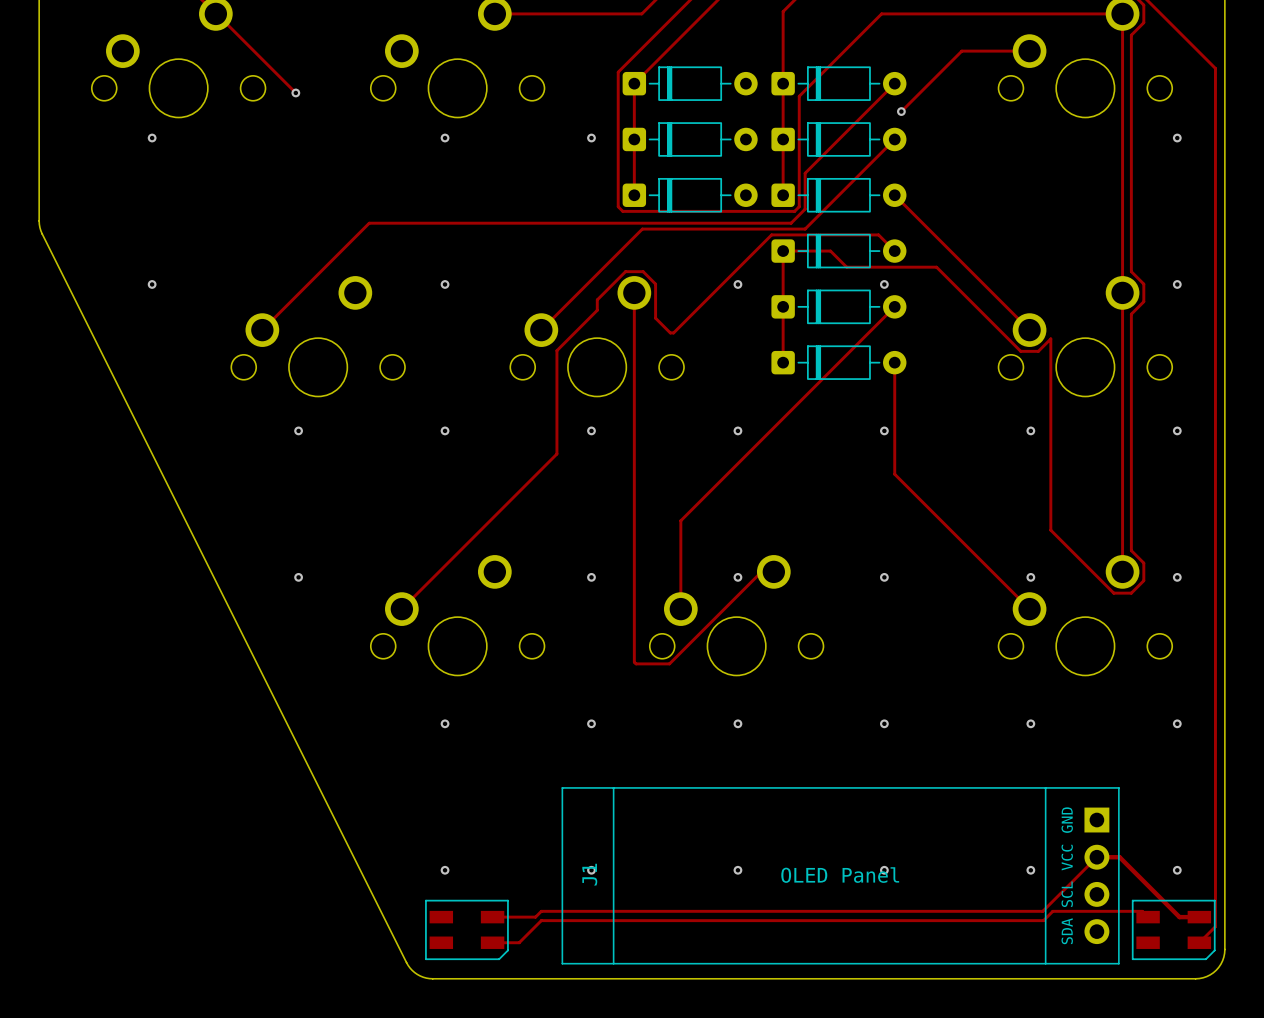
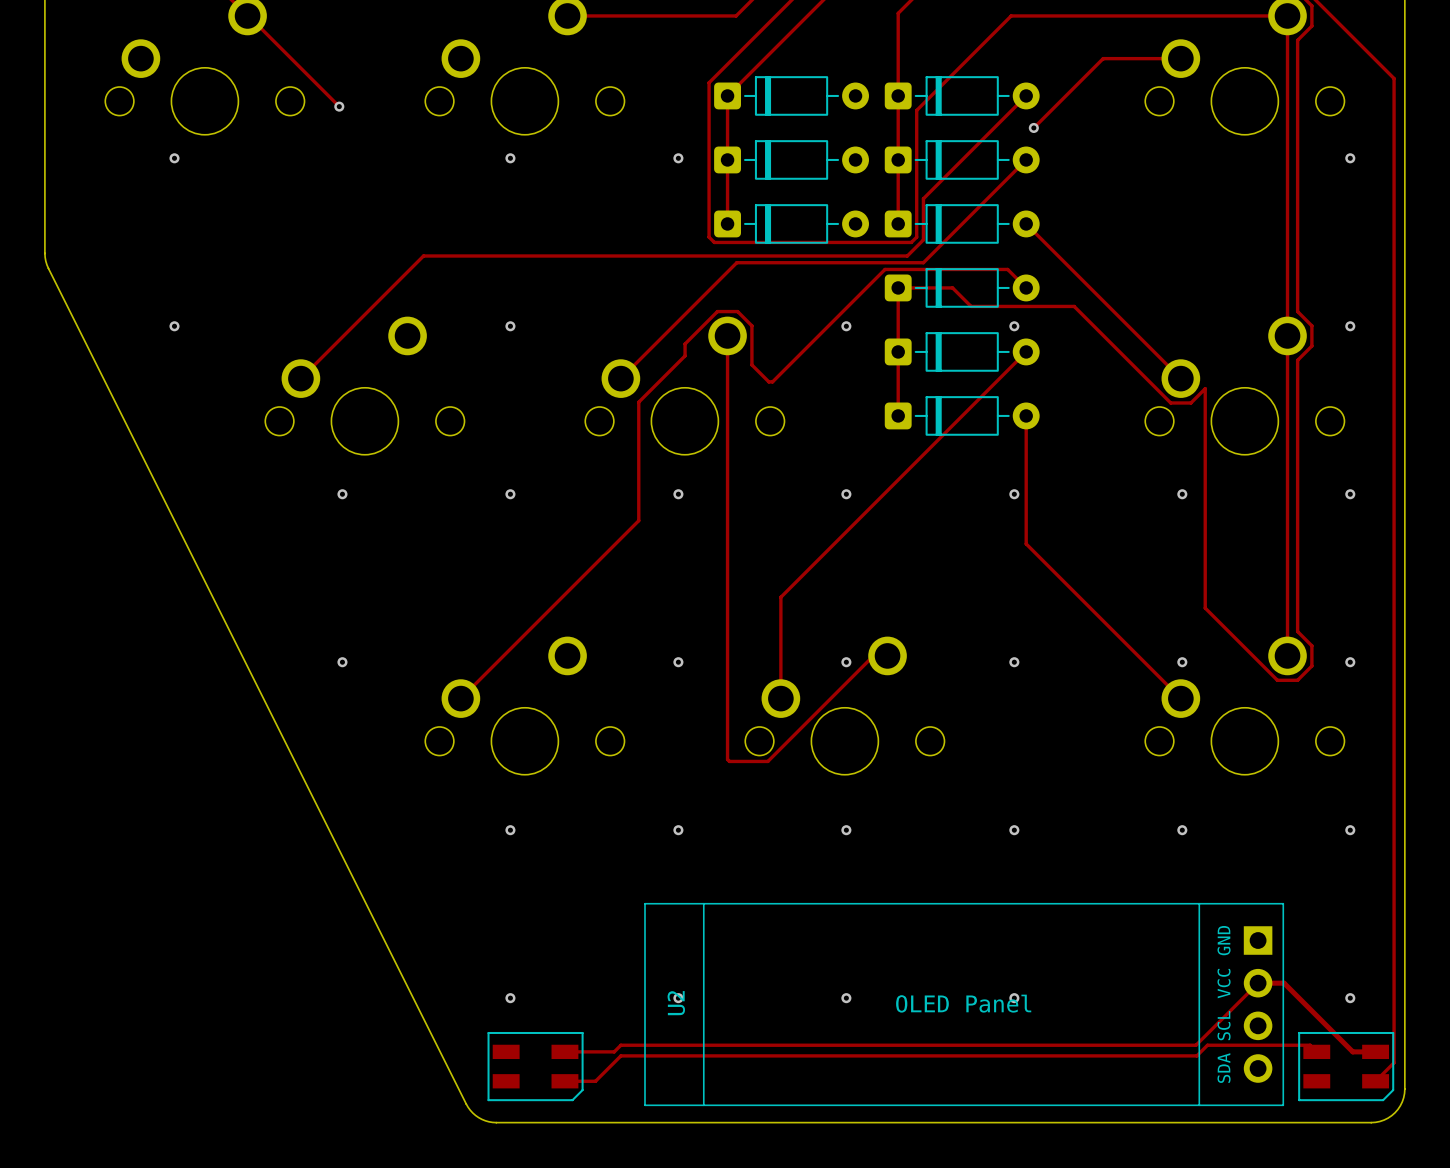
via: (1030, 870) -> none
J1 name: J1 (589, 874) -> U2 (676, 1003)

